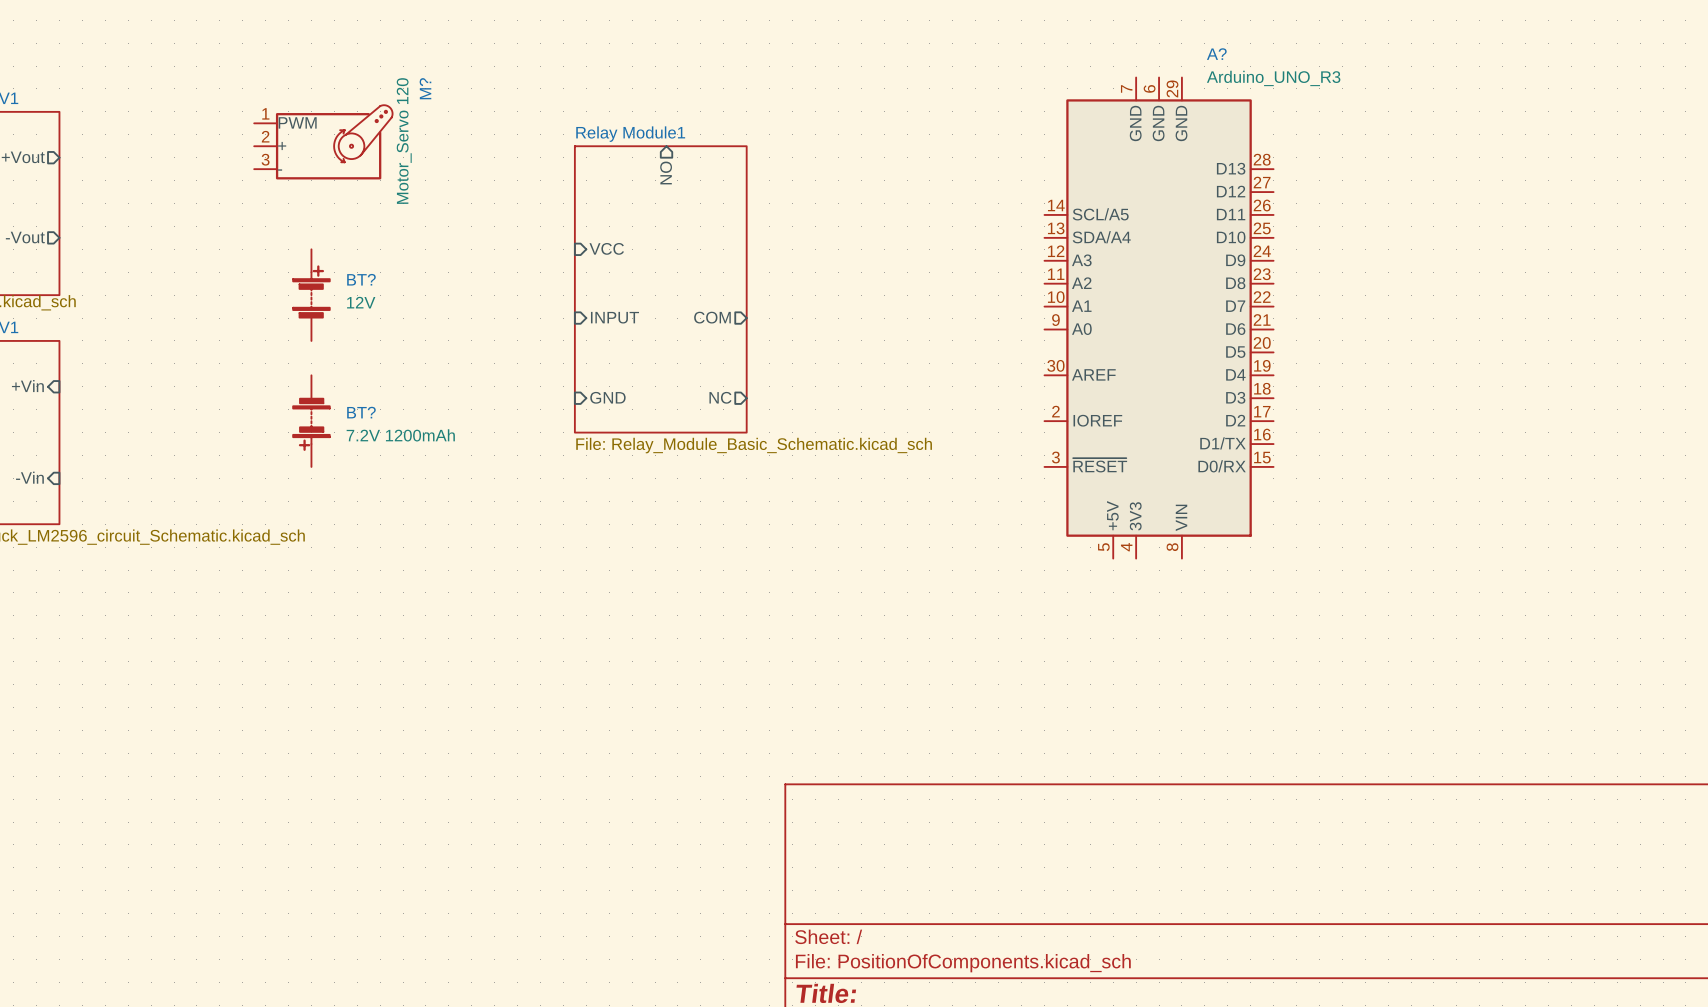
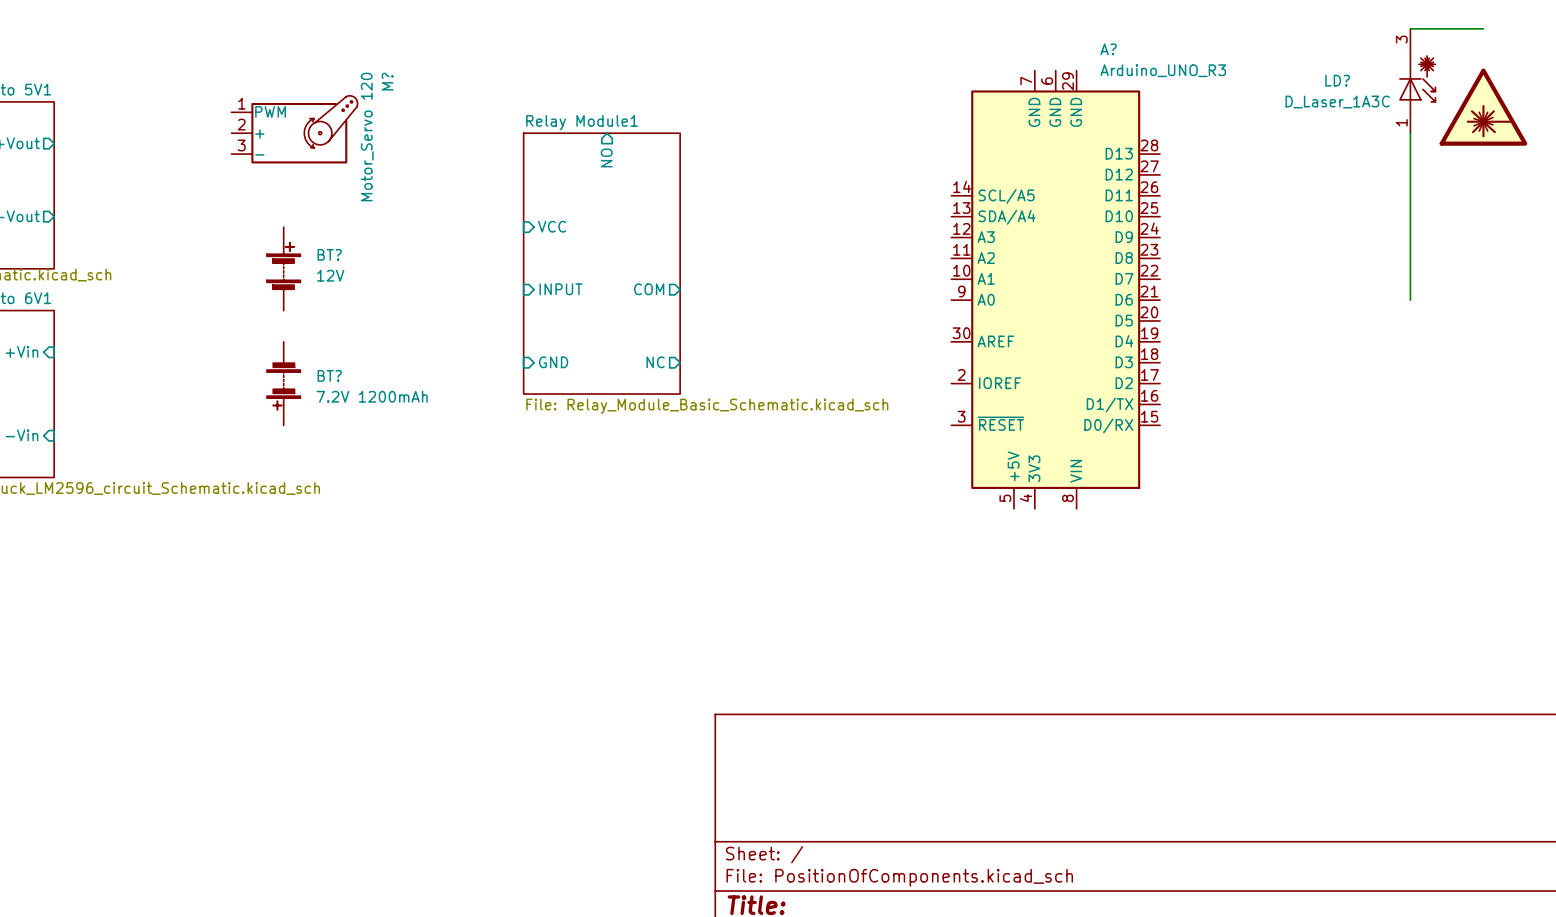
wire: none -> (1410, 28) (1483, 28)
LD?: none -> D_Laser_1A3C (1417, 81)
power symbol: none -> (1483, 107)
wire: none -> (1410, 133) (1410, 300)

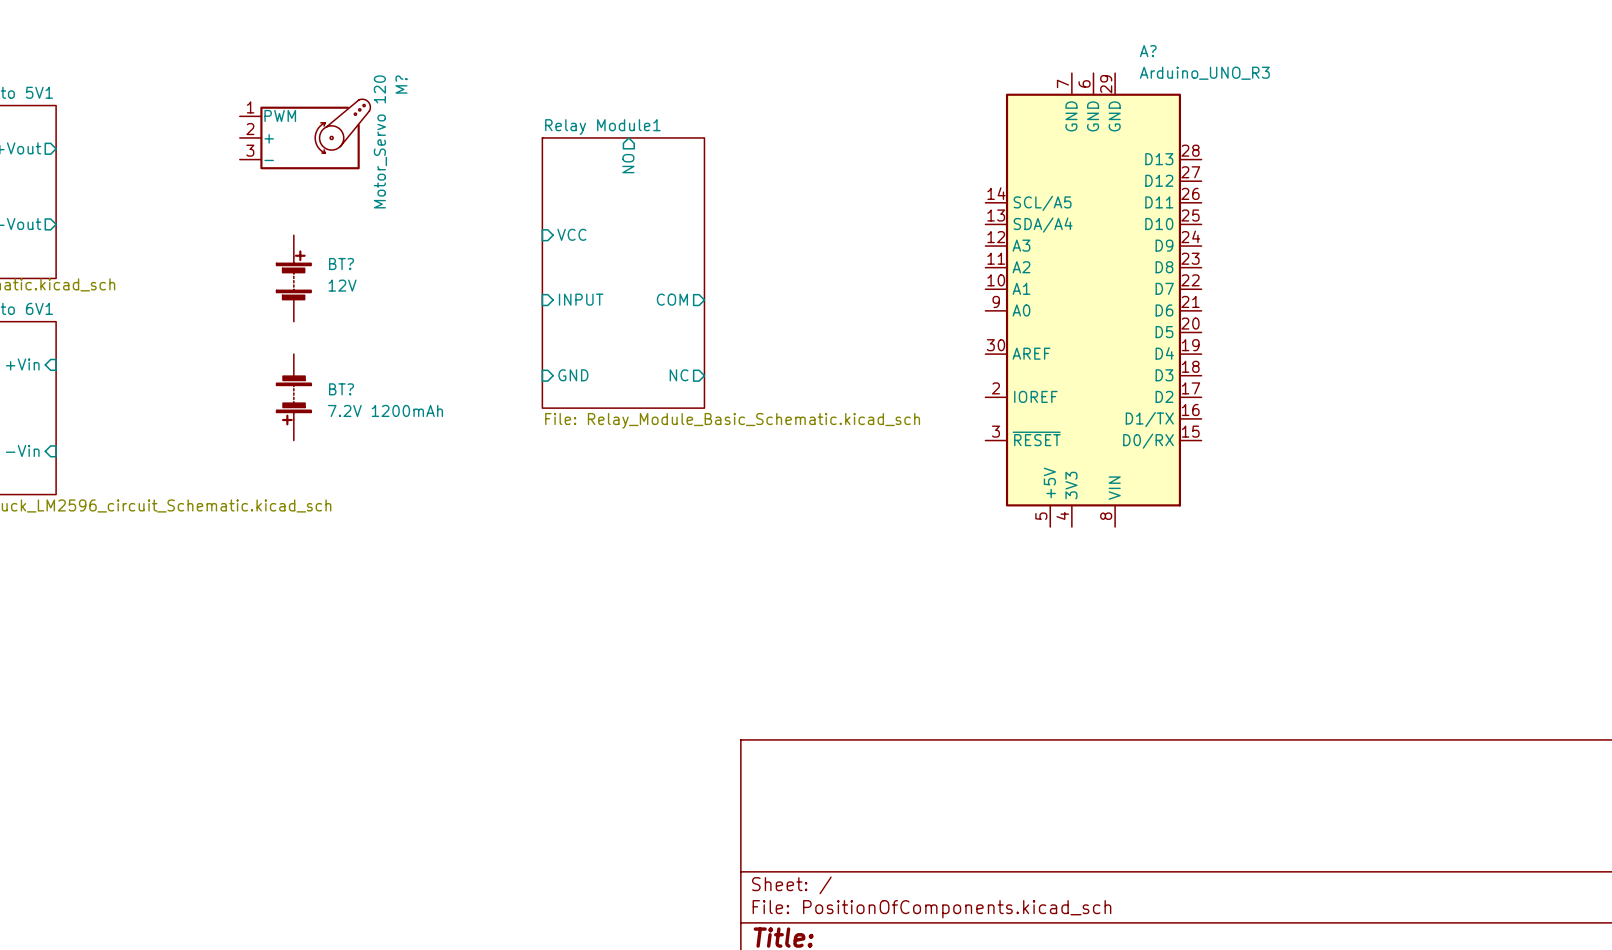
wire: (1410, 28) (1483, 28) -> none
LD?: D_Laser_1A3C (1417, 81) -> none
power symbol: (1483, 107) -> none
wire: (1410, 133) (1410, 300) -> none

